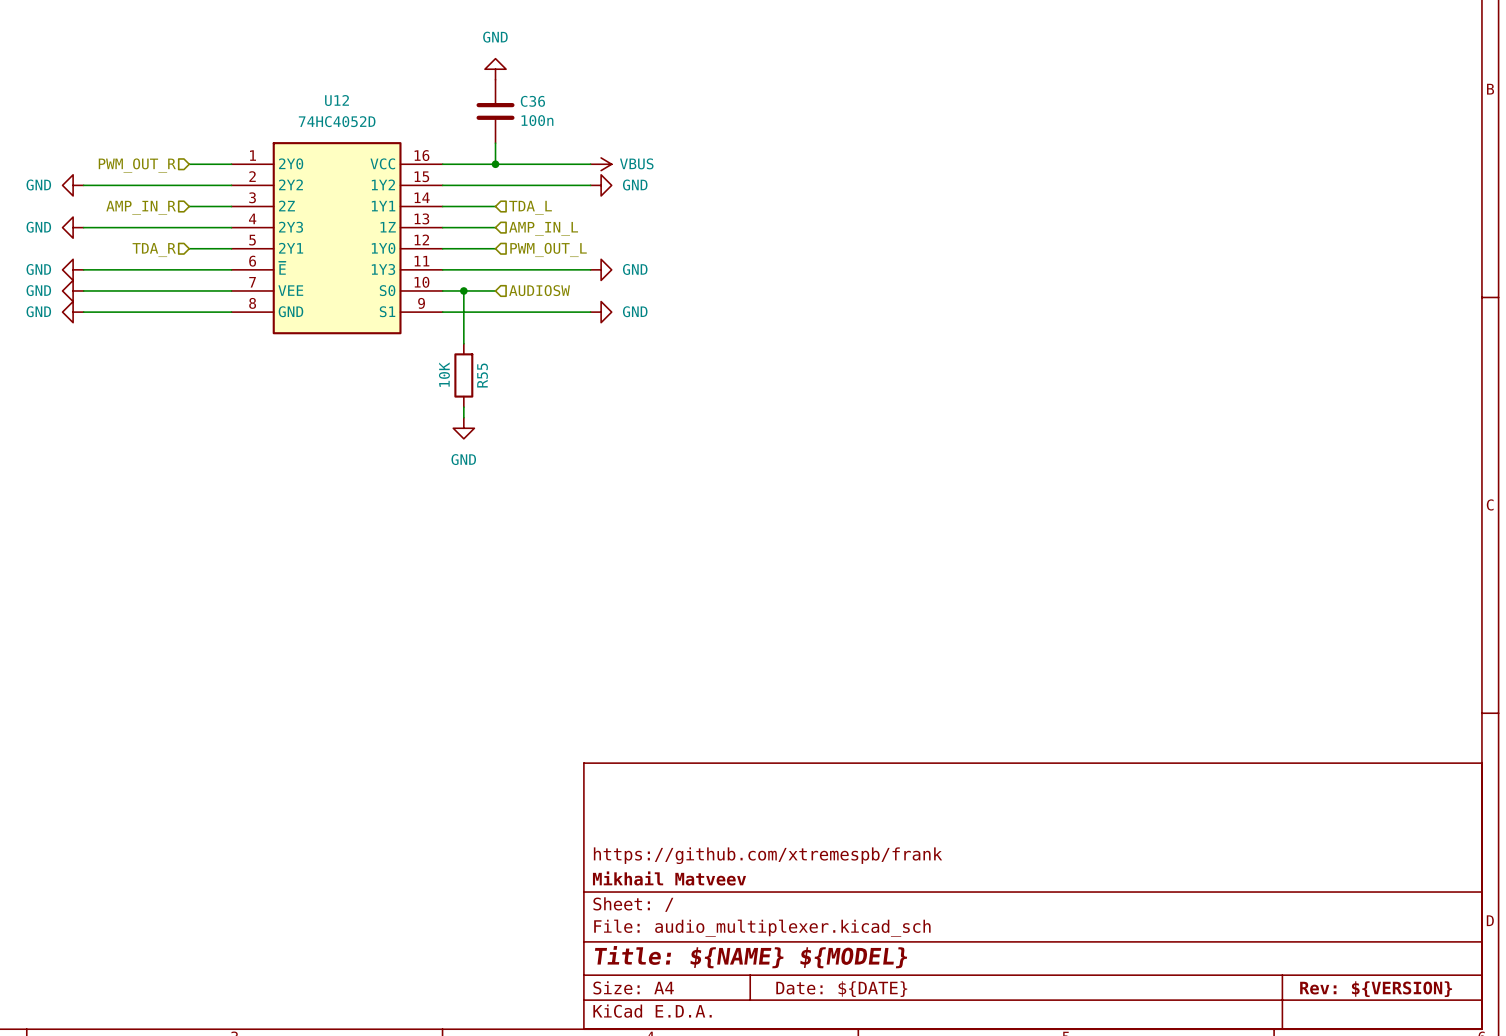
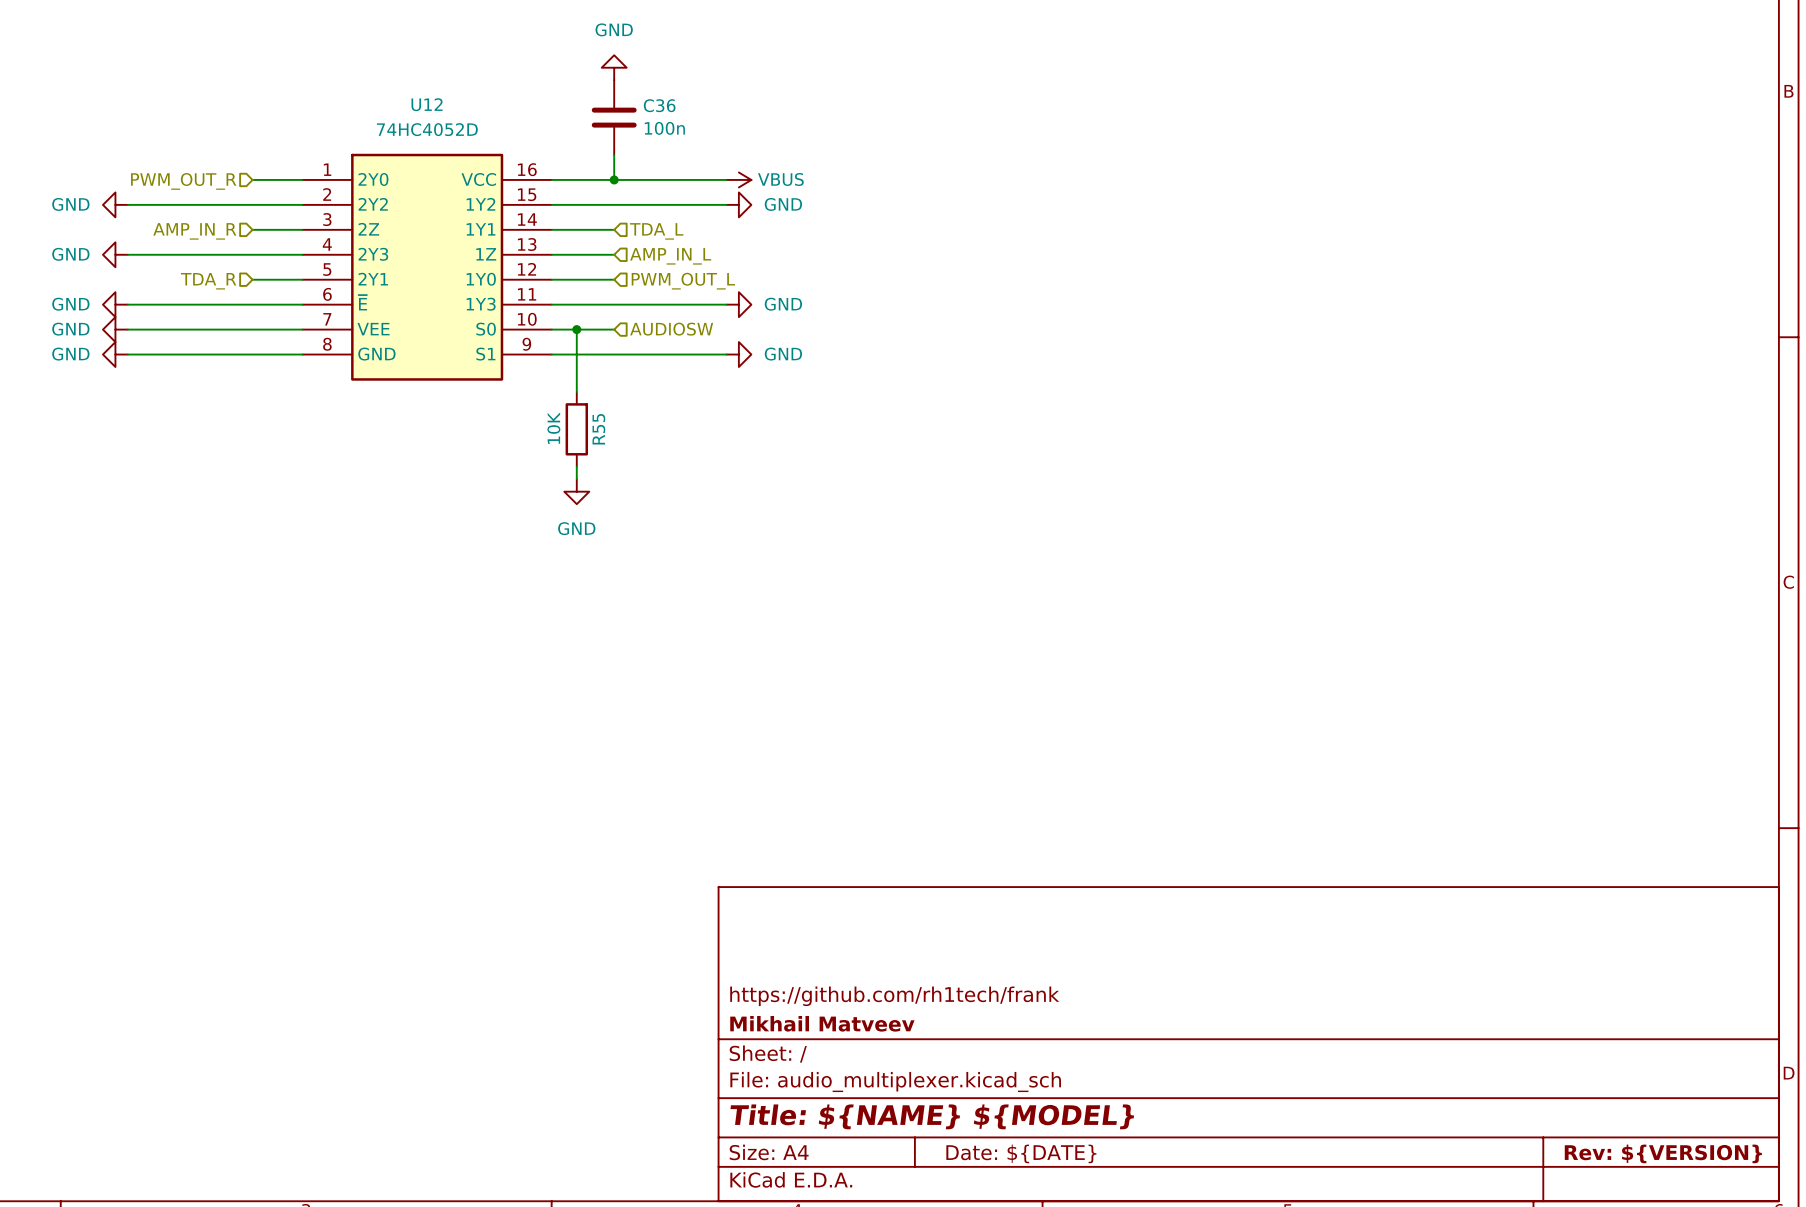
title block: https://github.com/xtremespb/frank (768, 855) -> https://github.com/rh1tech/frank (894, 996)

